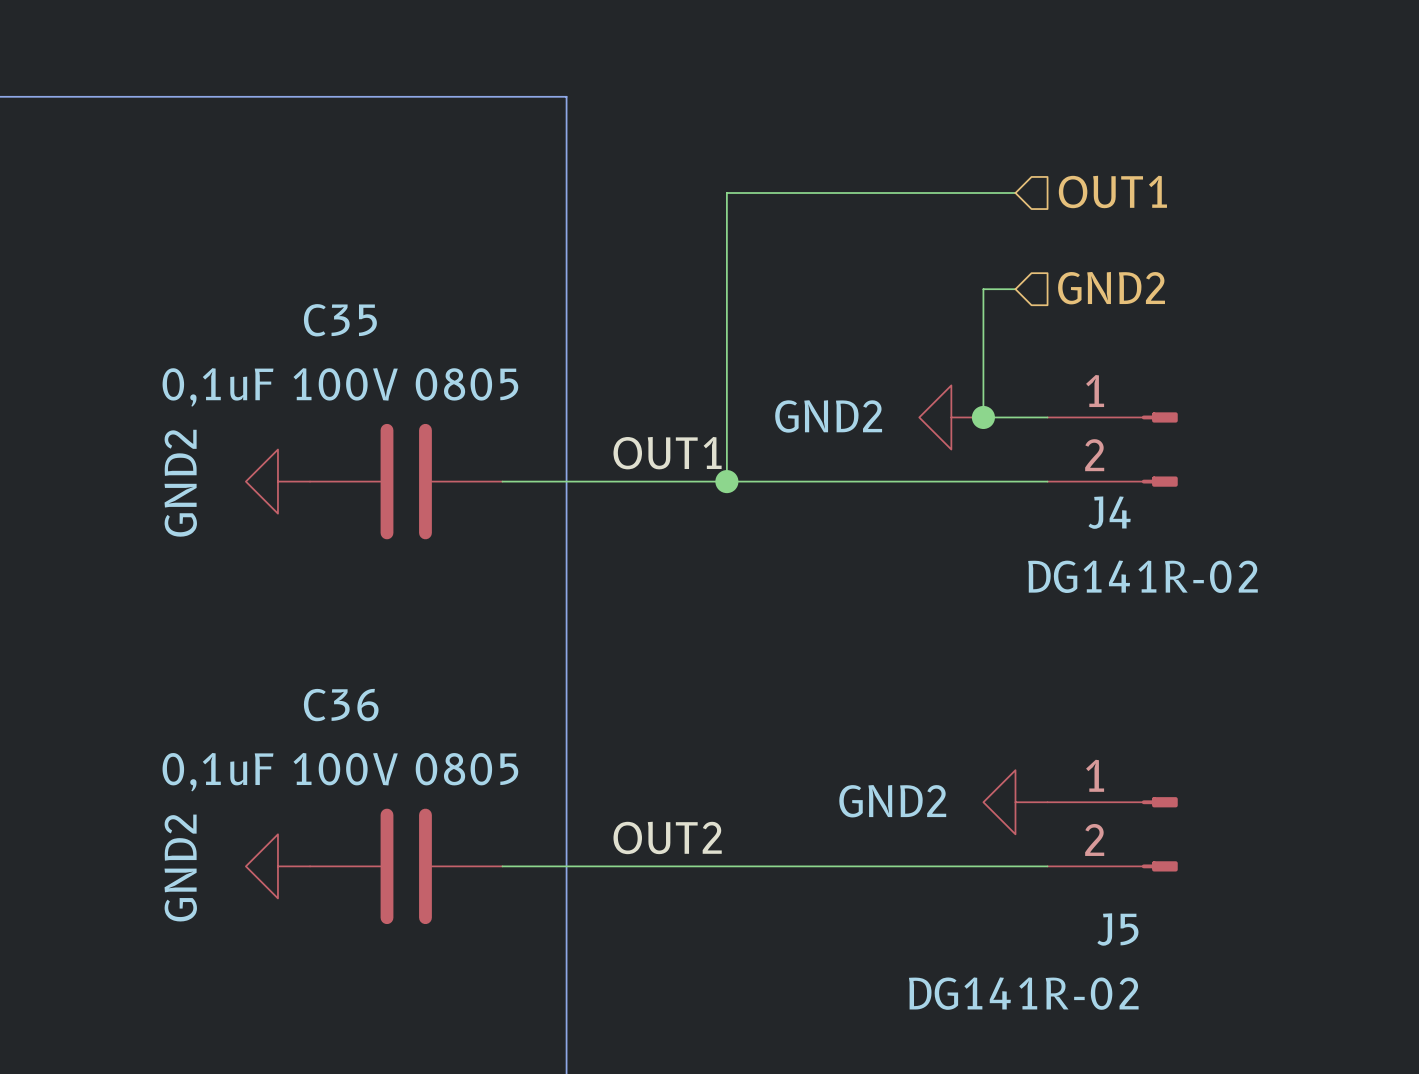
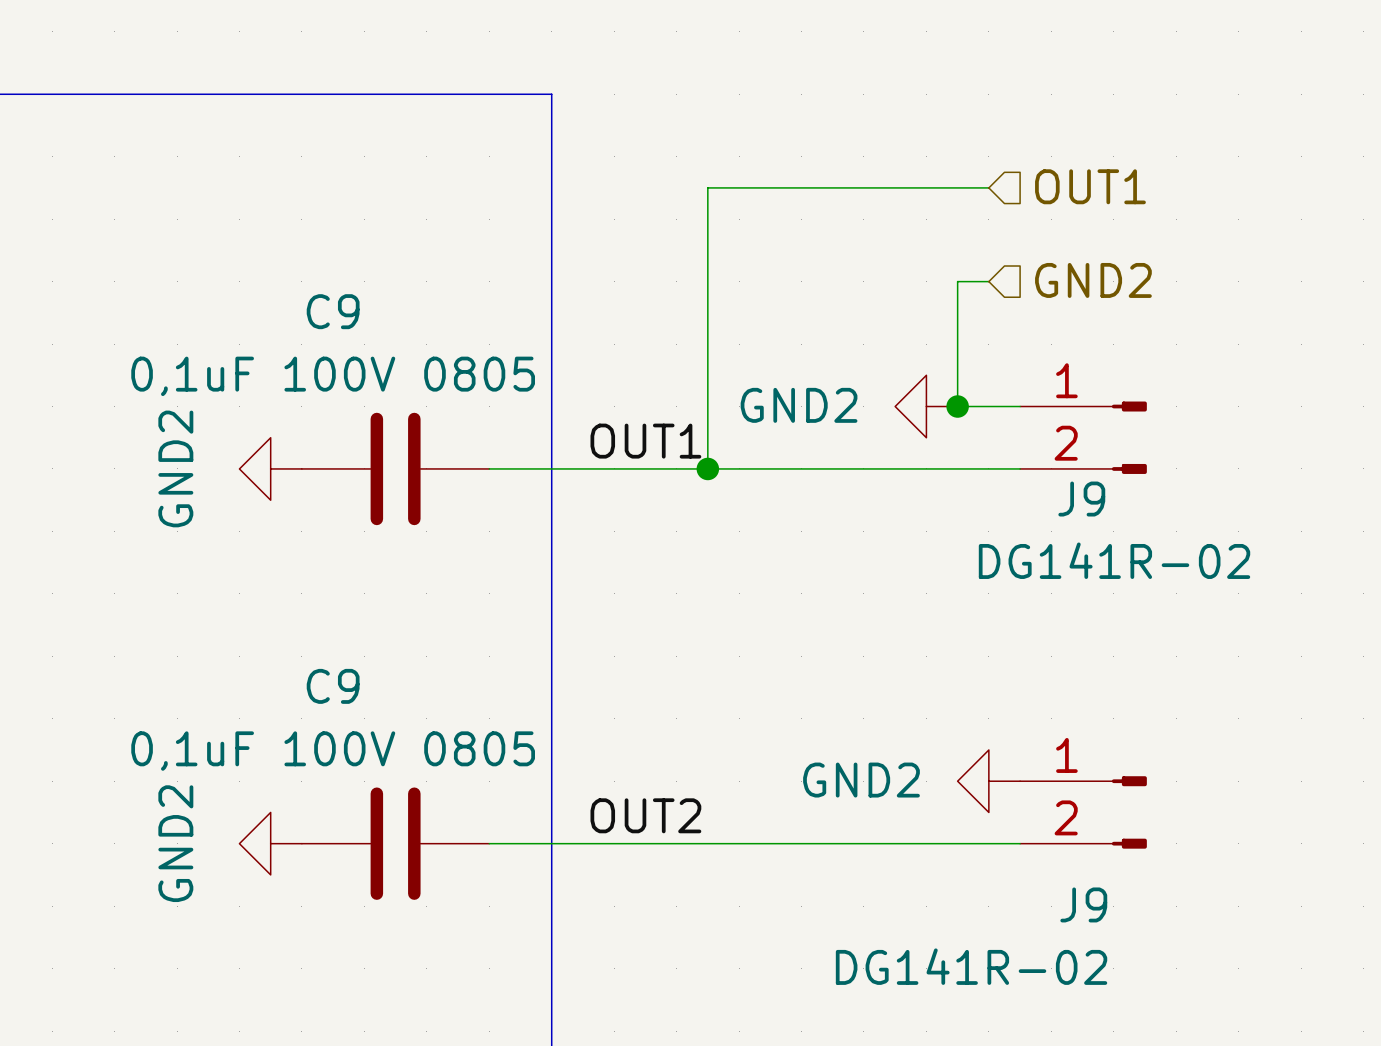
C35 name: C35 (340, 320) -> C9 (333, 311)
J4 name: J4 (1109, 512) -> J9 (1081, 499)
C36 name: C36 (341, 705) -> C9 (333, 686)
J5 name: J5 (1117, 929) -> J9 (1083, 904)

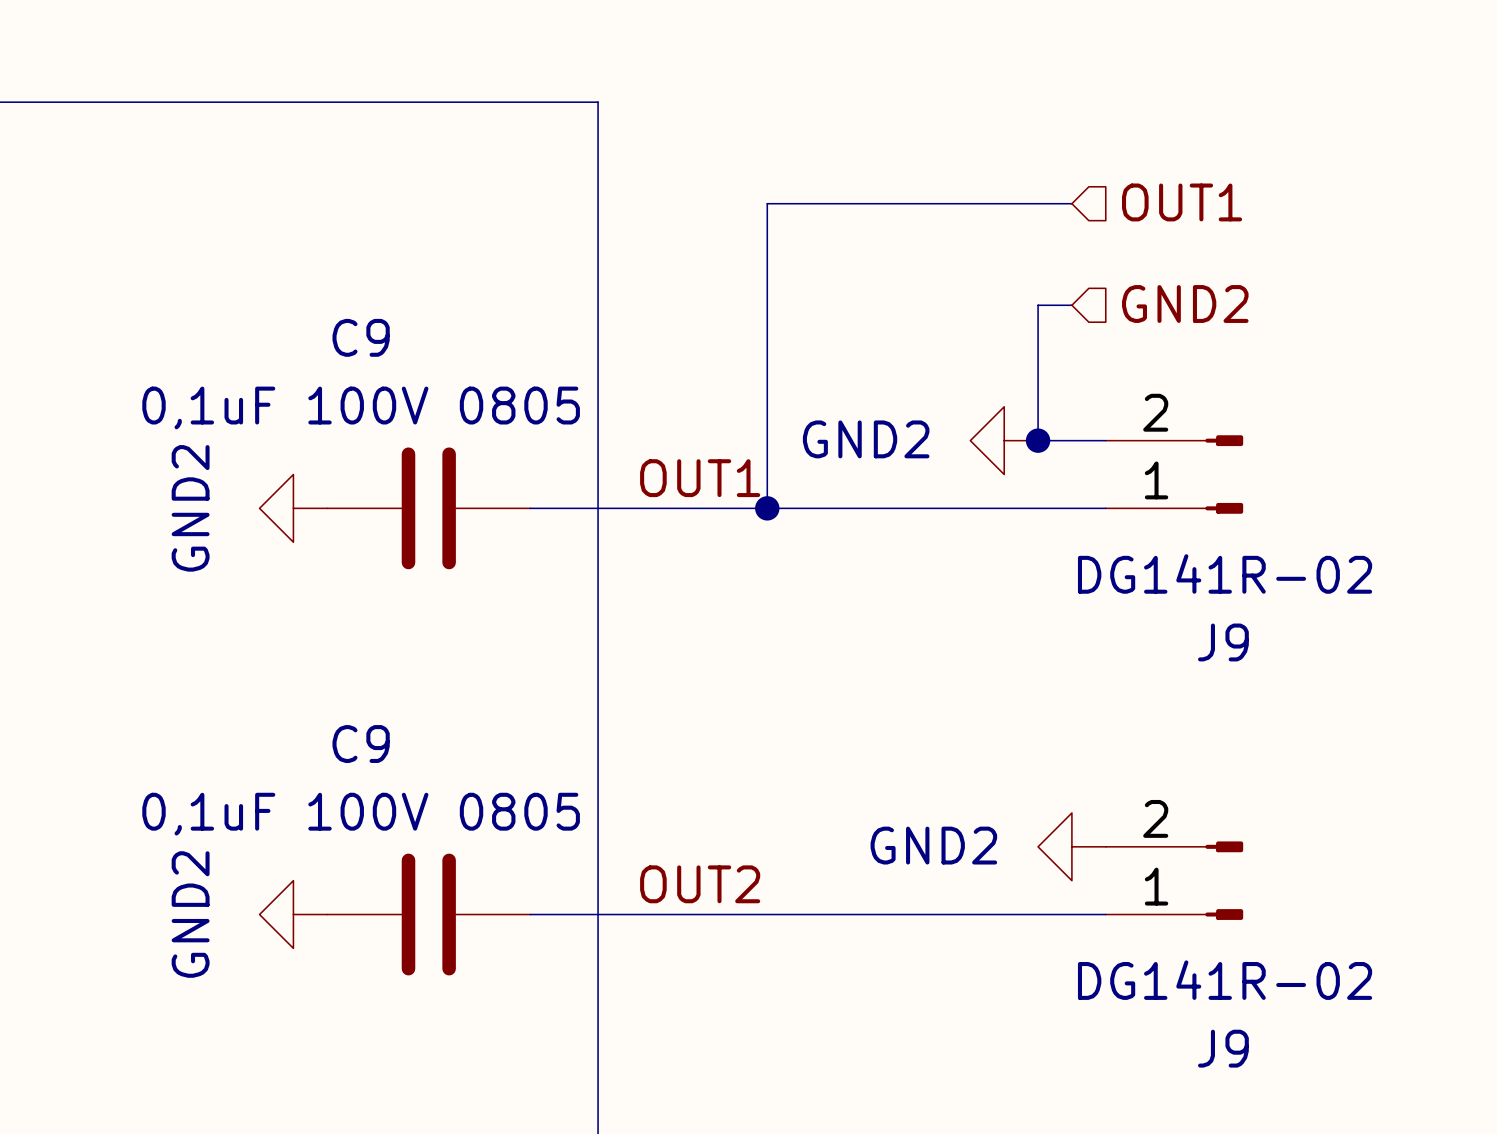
J9 flip: as is (1129, 437) -> up-down (1224, 474)
J9 name position: J9 (1081, 499) -> J9 (1223, 642)
J9 flip: as is (1129, 812) -> up-down (1224, 880)
J9 name position: J9 (1083, 904) -> J9 (1223, 1048)
J9 value position: DG141R-02 (971, 966) -> DG141R-02 (1225, 980)

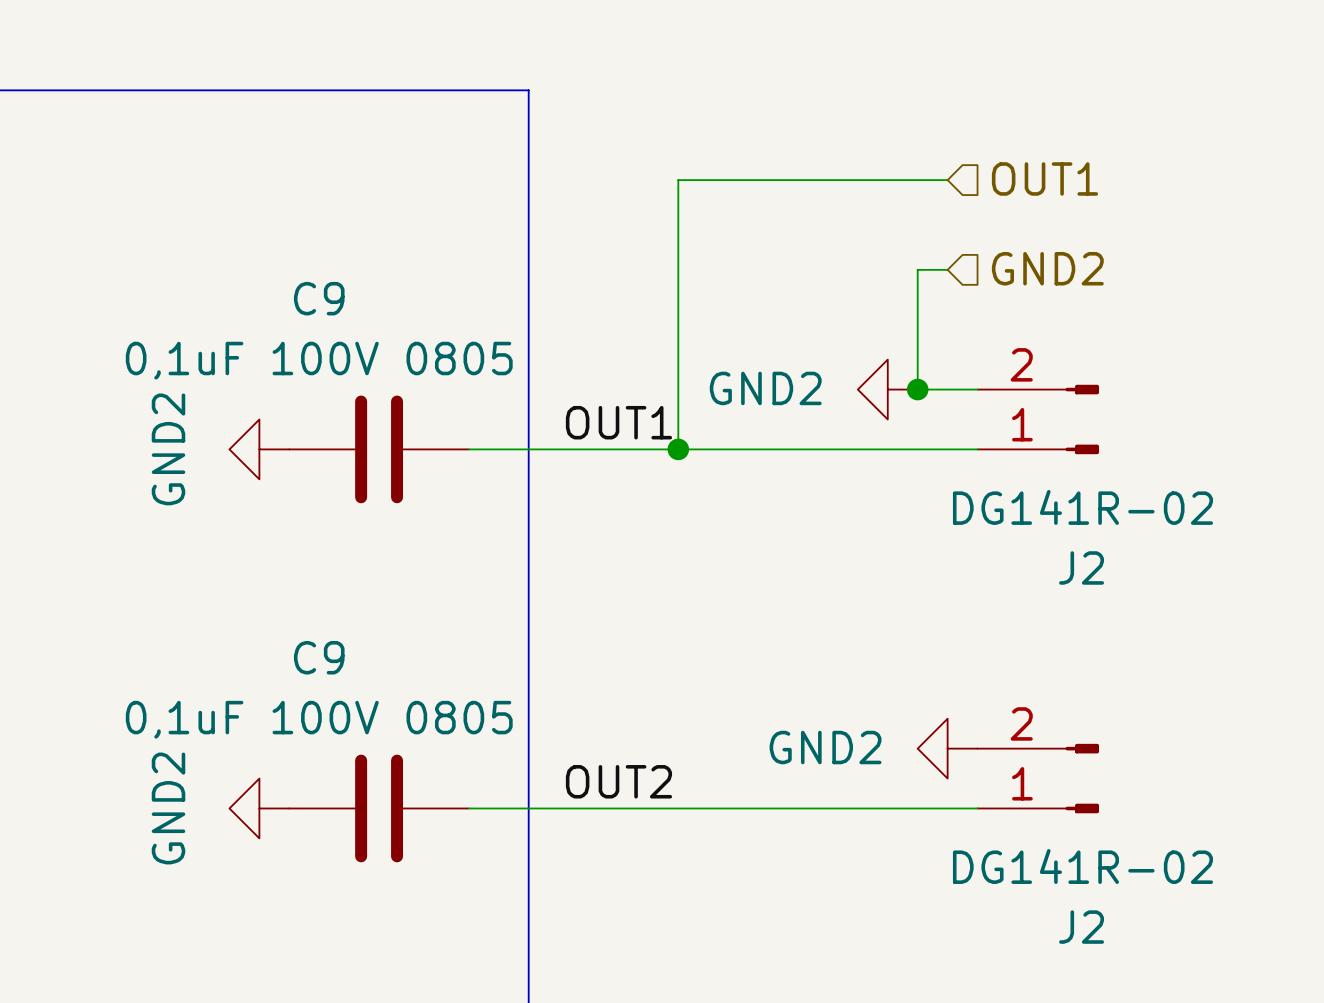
J9 name: J9 (1223, 642) -> J2 (1081, 567)
J9 name: J9 (1223, 1048) -> J2 (1081, 927)

